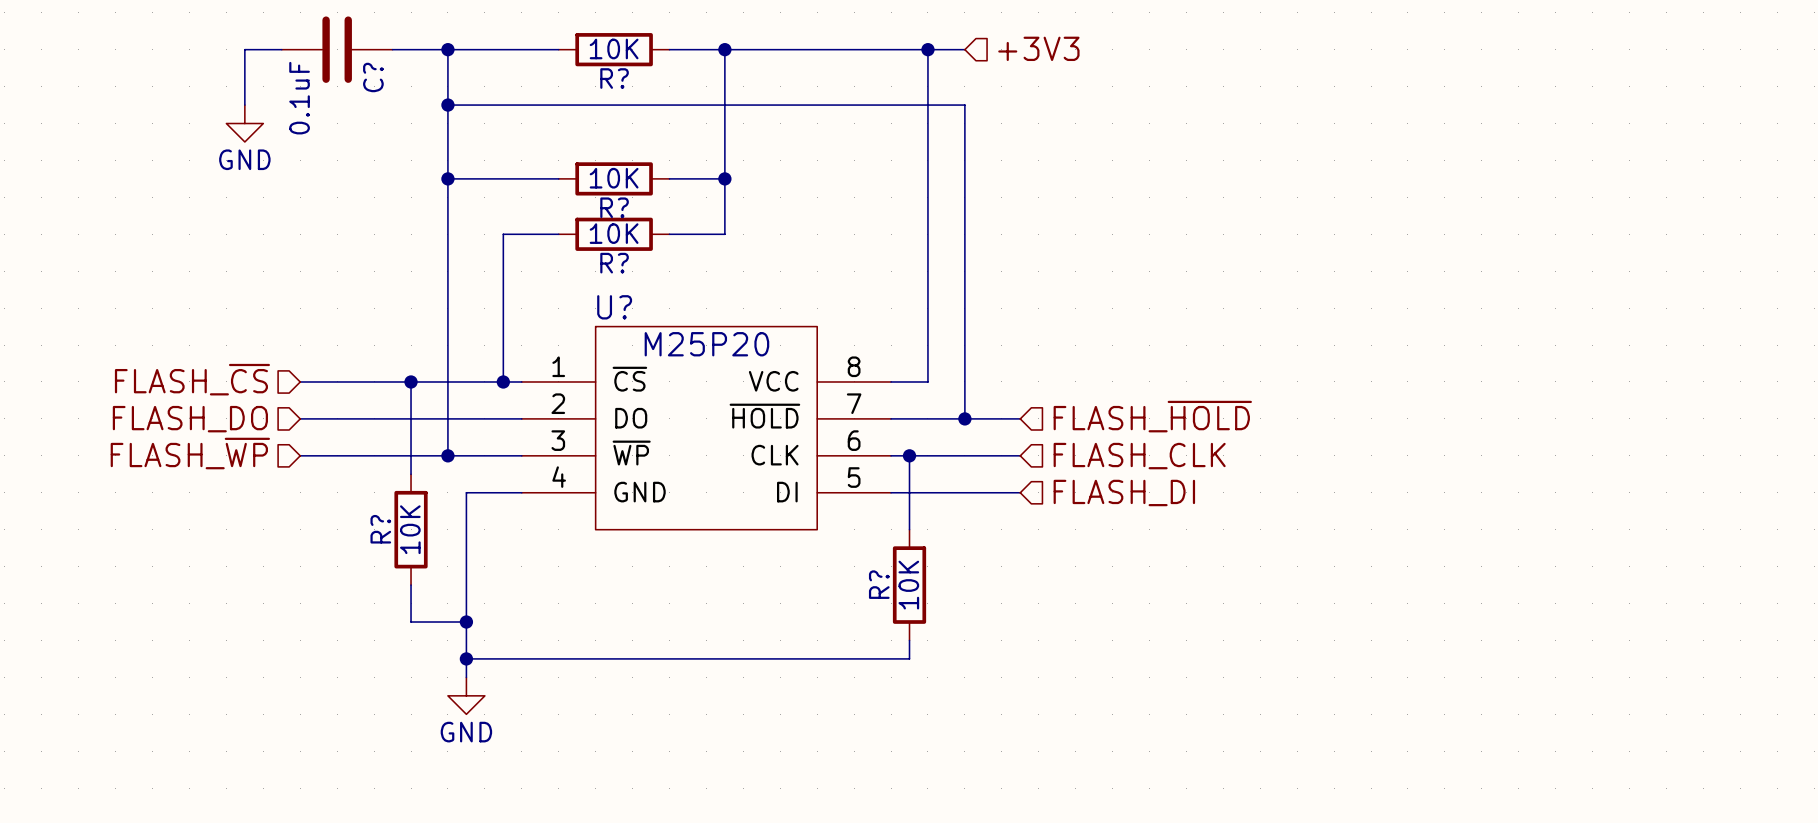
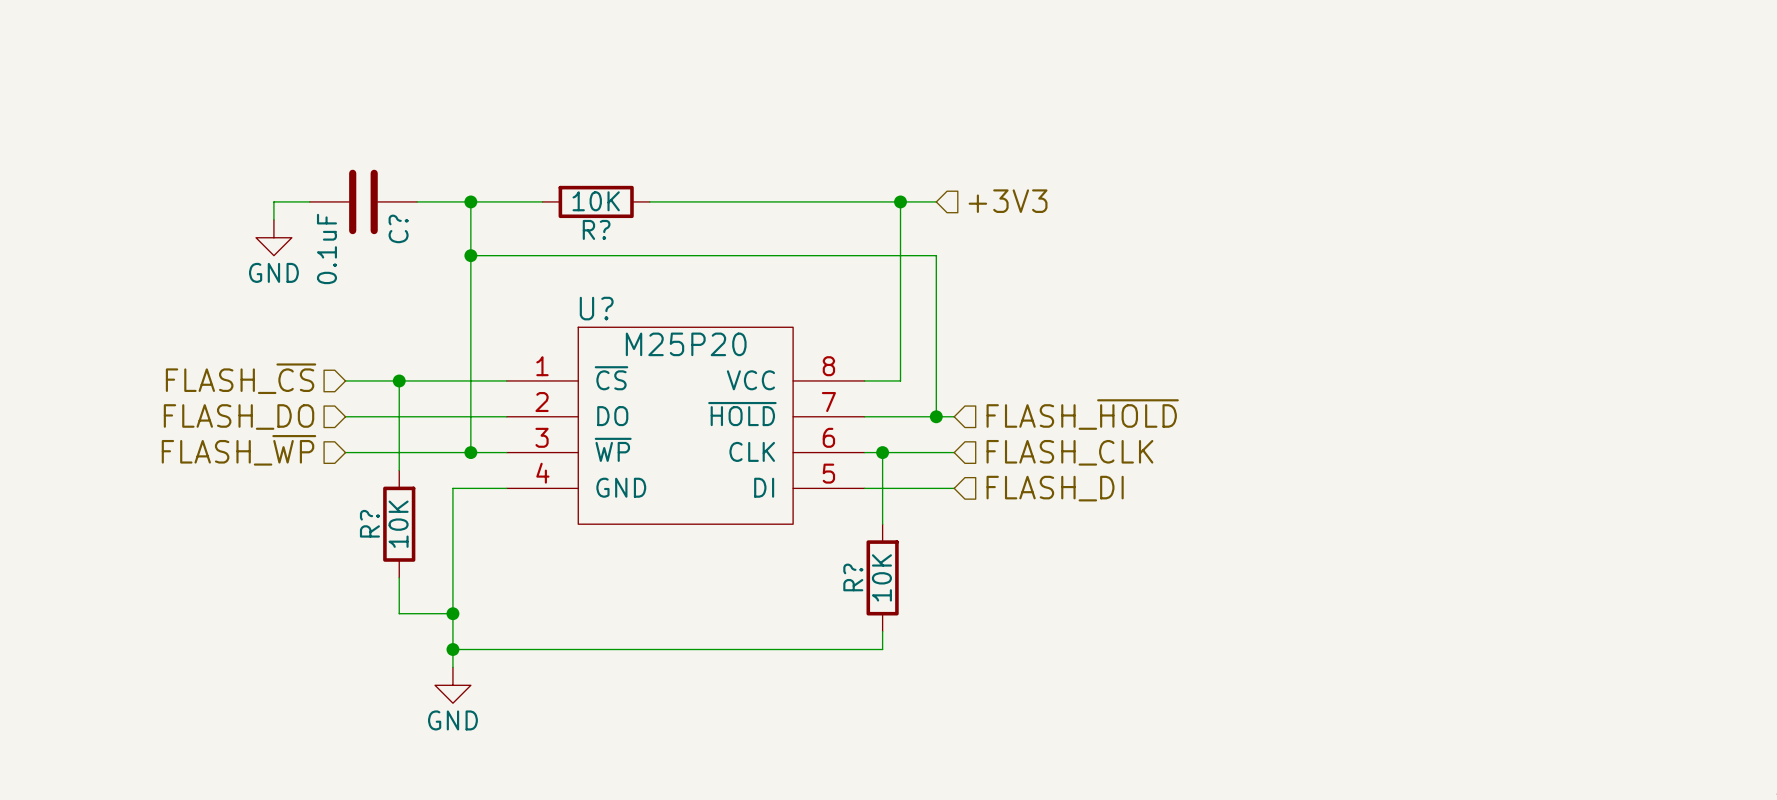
hierarchical label position: +3V3 (1038, 48) -> +3V3 (1008, 201)
wire: (281, 49) (244, 49) (244, 105) -> none
C? position: (337, 49) -> (363, 201)
wire: (392, 49) (558, 49) -> none
wire: (447, 49) (447, 455) -> none
junction: (447, 49) -> none
R?: 10K (614, 49) -> none
wire: (669, 49) (964, 49) -> (649, 201) (936, 201)
wire: (724, 49) (724, 234) (669, 234) -> none
junction: (724, 49) -> none
wire: (927, 49) (927, 197) -> none
junction: (927, 49) -> none
wire: (447, 105) (964, 105) (964, 252) -> (470, 255) (936, 255)
junction: (447, 105) -> none
power symbol position: GND (244, 123) -> GND (273, 237)
wire: (447, 178) (558, 178) -> none
junction: (447, 178) -> none
R?: 10K (614, 178) -> none
wire: (669, 178) (724, 178) -> none
junction: (724, 178) -> none
wire: none -> (309, 201) (273, 201) (273, 219)
wire: none -> (417, 201) (542, 201)
wire: none -> (470, 201) (470, 452)
junction: none -> (470, 201)
R?: none -> 10K (596, 201)
junction: none -> (900, 201)
wire: (558, 234) (503, 234) (503, 381) -> none
R?: 10K (614, 234) -> none
junction: none -> (470, 255)
hierarchical label position: FLASH_~{CS} (192, 379) -> FLASH_~{CS} (241, 378)
wire: (300, 381) (355, 381) -> none
junction: (503, 381) -> none
hierarchical label position: FLASH_~{HOLD} (1152, 416) -> FLASH_~{HOLD} (1082, 414)
wire: (300, 418) (355, 418) -> none
wire: (983, 418) (1020, 418) -> none
hierarchical label position: FLASH_DO (190, 419) -> FLASH_DO (239, 417)
hierarchical label position: FLASH_~{WP} (190, 453) -> FLASH_~{WP} (238, 450)
wire: (300, 455) (355, 455) -> none
junction position: (447, 455) -> (470, 452)
wire: (983, 455) (1020, 455) -> none
hierarchical label position: FLASH_CLK (1139, 456) -> FLASH_CLK (1069, 452)
wire: (983, 492) (1020, 492) -> none
hierarchical label position: FLASH_DI (1124, 492) -> FLASH_DI (1055, 488)

